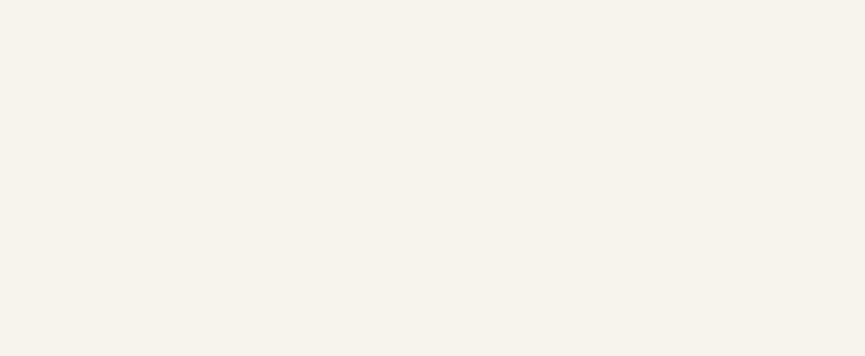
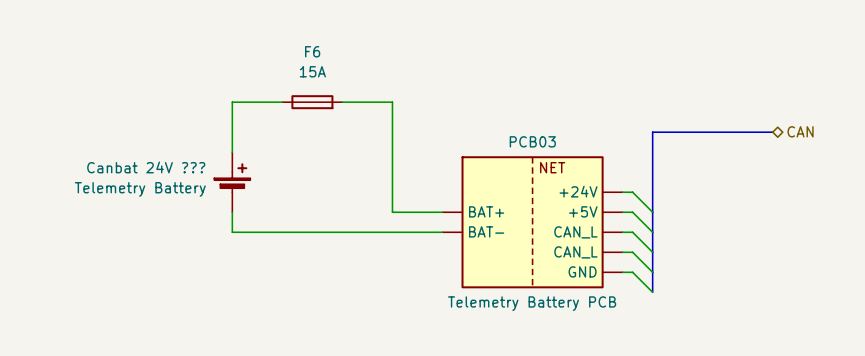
wire: none -> (282, 102) (232, 102) (232, 152)
F6: none -> 15A (312, 102)
wire: none -> (342, 102) (392, 102) (392, 212) (442, 212)
hierarchical label: none -> CAN (800, 131)
bus: none -> (772, 132) (652, 132) (652, 292)
part: none -> Canbat 24V ??? (232, 182)
wire: none -> (622, 192) (632, 192) (652, 212)
wire: none -> (232, 212) (232, 232) (442, 232)
wire: none -> (622, 212) (632, 212) (652, 232)
part: none -> PCB03 (532, 222)
wire: none -> (622, 232) (632, 232) (652, 252)
wire: none -> (622, 252) (632, 252) (652, 272)
wire: none -> (622, 272) (632, 272) (652, 292)

